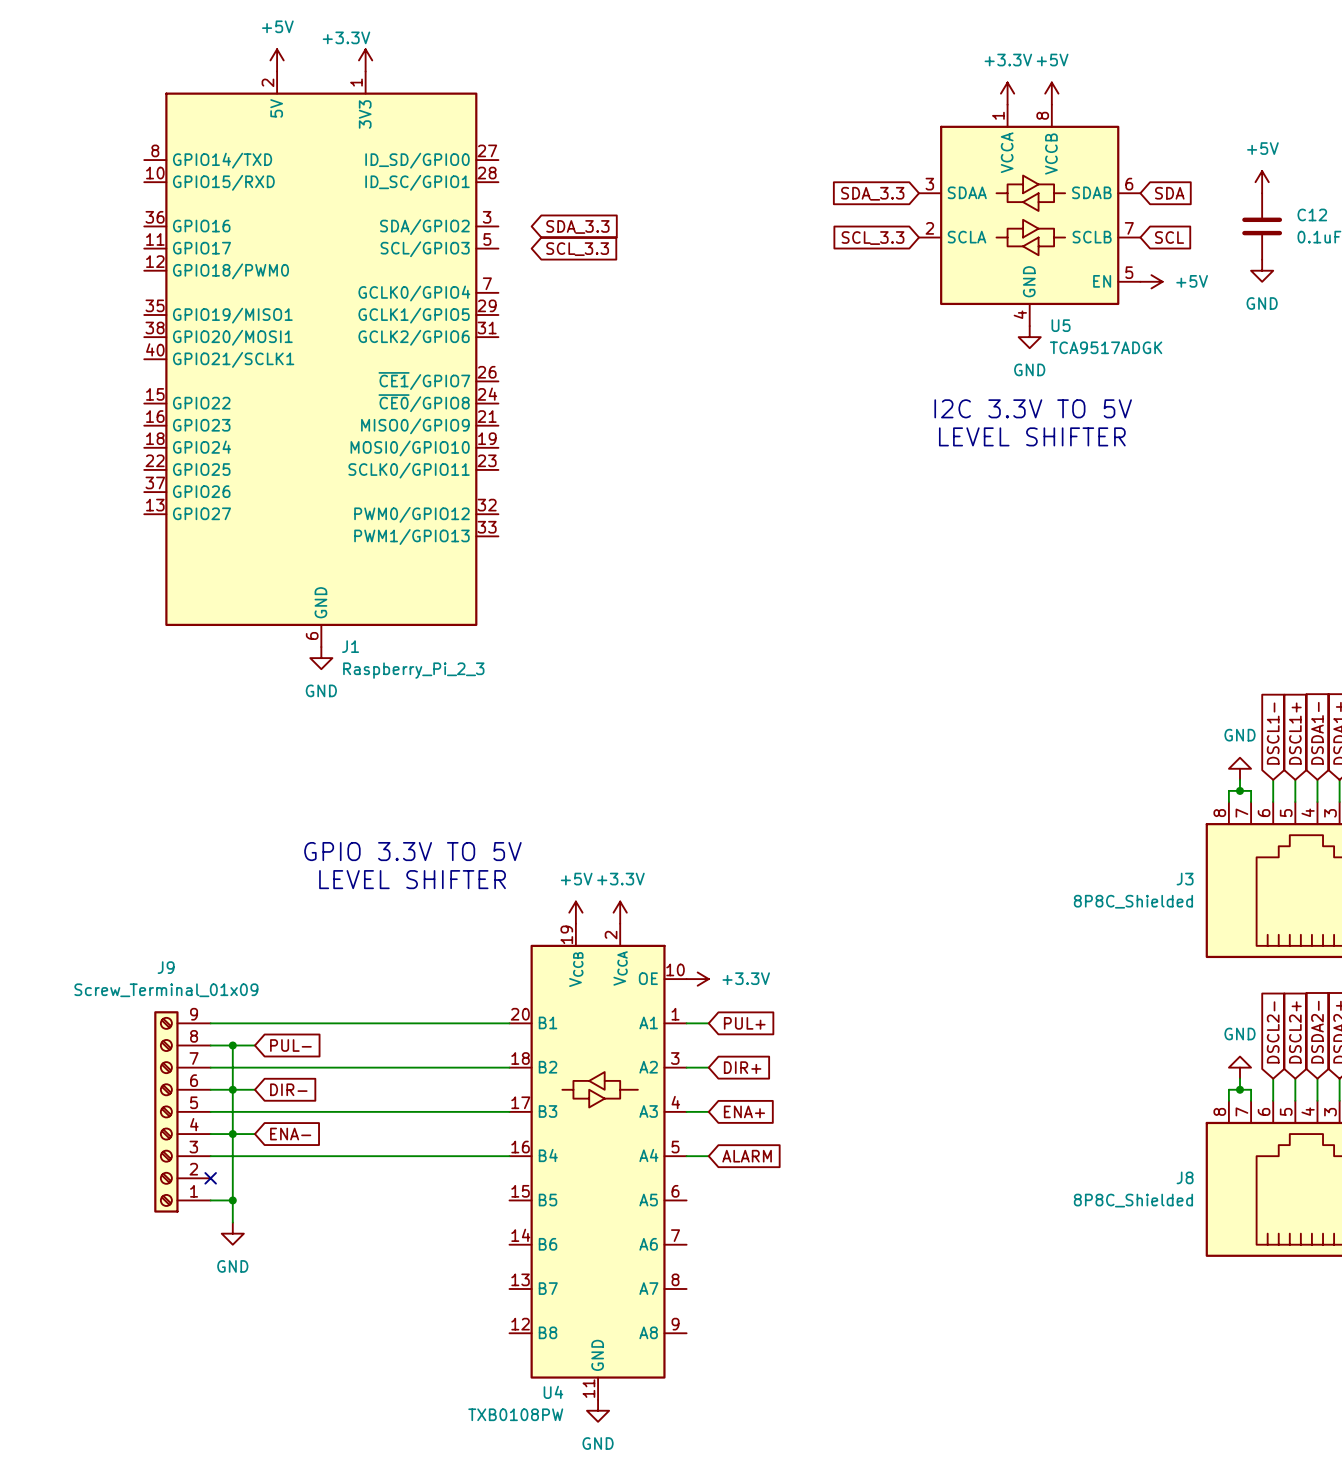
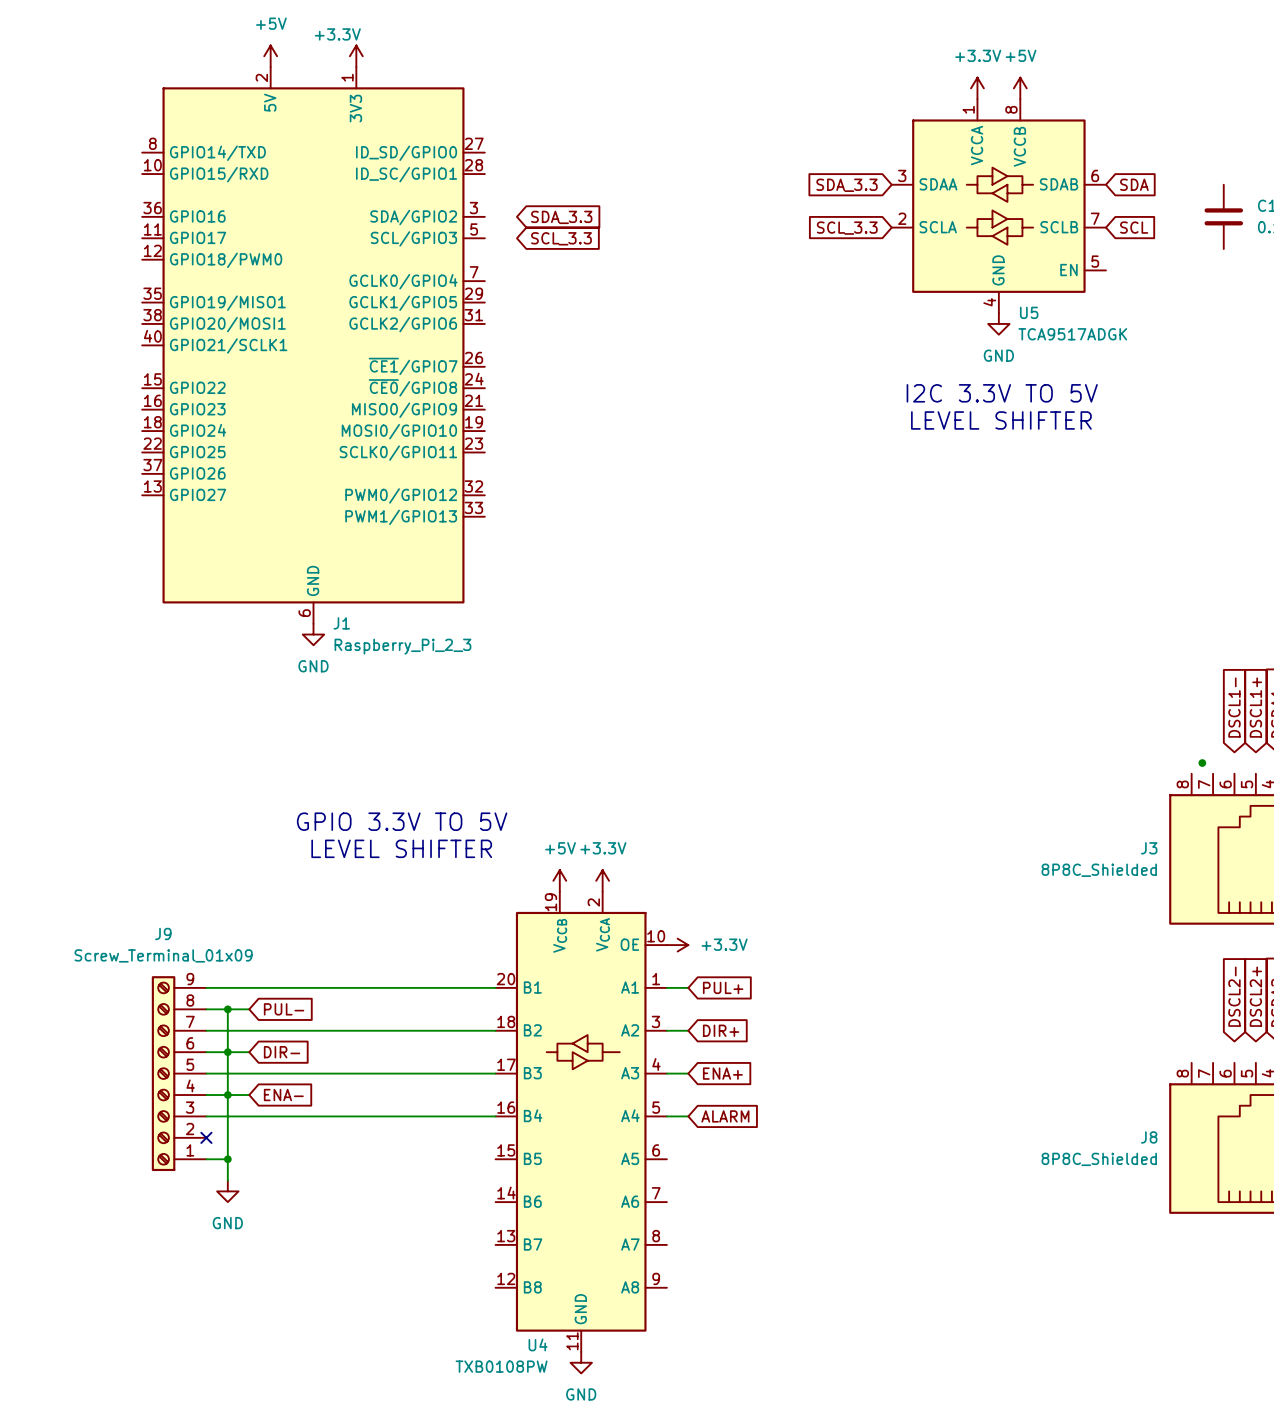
power symbol: +5V (1262, 182) -> none
power symbol: GND (1262, 270) -> none
power symbol: +5V (1151, 281) -> none
power symbol: GND (1240, 768) -> none
wire: (1240, 779) (1240, 790) -> none
wire: (1273, 779) (1273, 801) -> none
wire: (1295, 779) (1295, 801) -> none
wire: (1228, 801) (1228, 790) (1251, 790) (1251, 801) -> none
power symbol: GND (1240, 1067) -> none
wire: (1240, 1078) (1240, 1089) -> none
wire: (1273, 1078) (1273, 1100) -> none
wire: (1295, 1078) (1295, 1100) -> none
junction: (1240, 1089) -> none
wire: (1228, 1100) (1228, 1089) (1251, 1089) (1251, 1100) -> none

